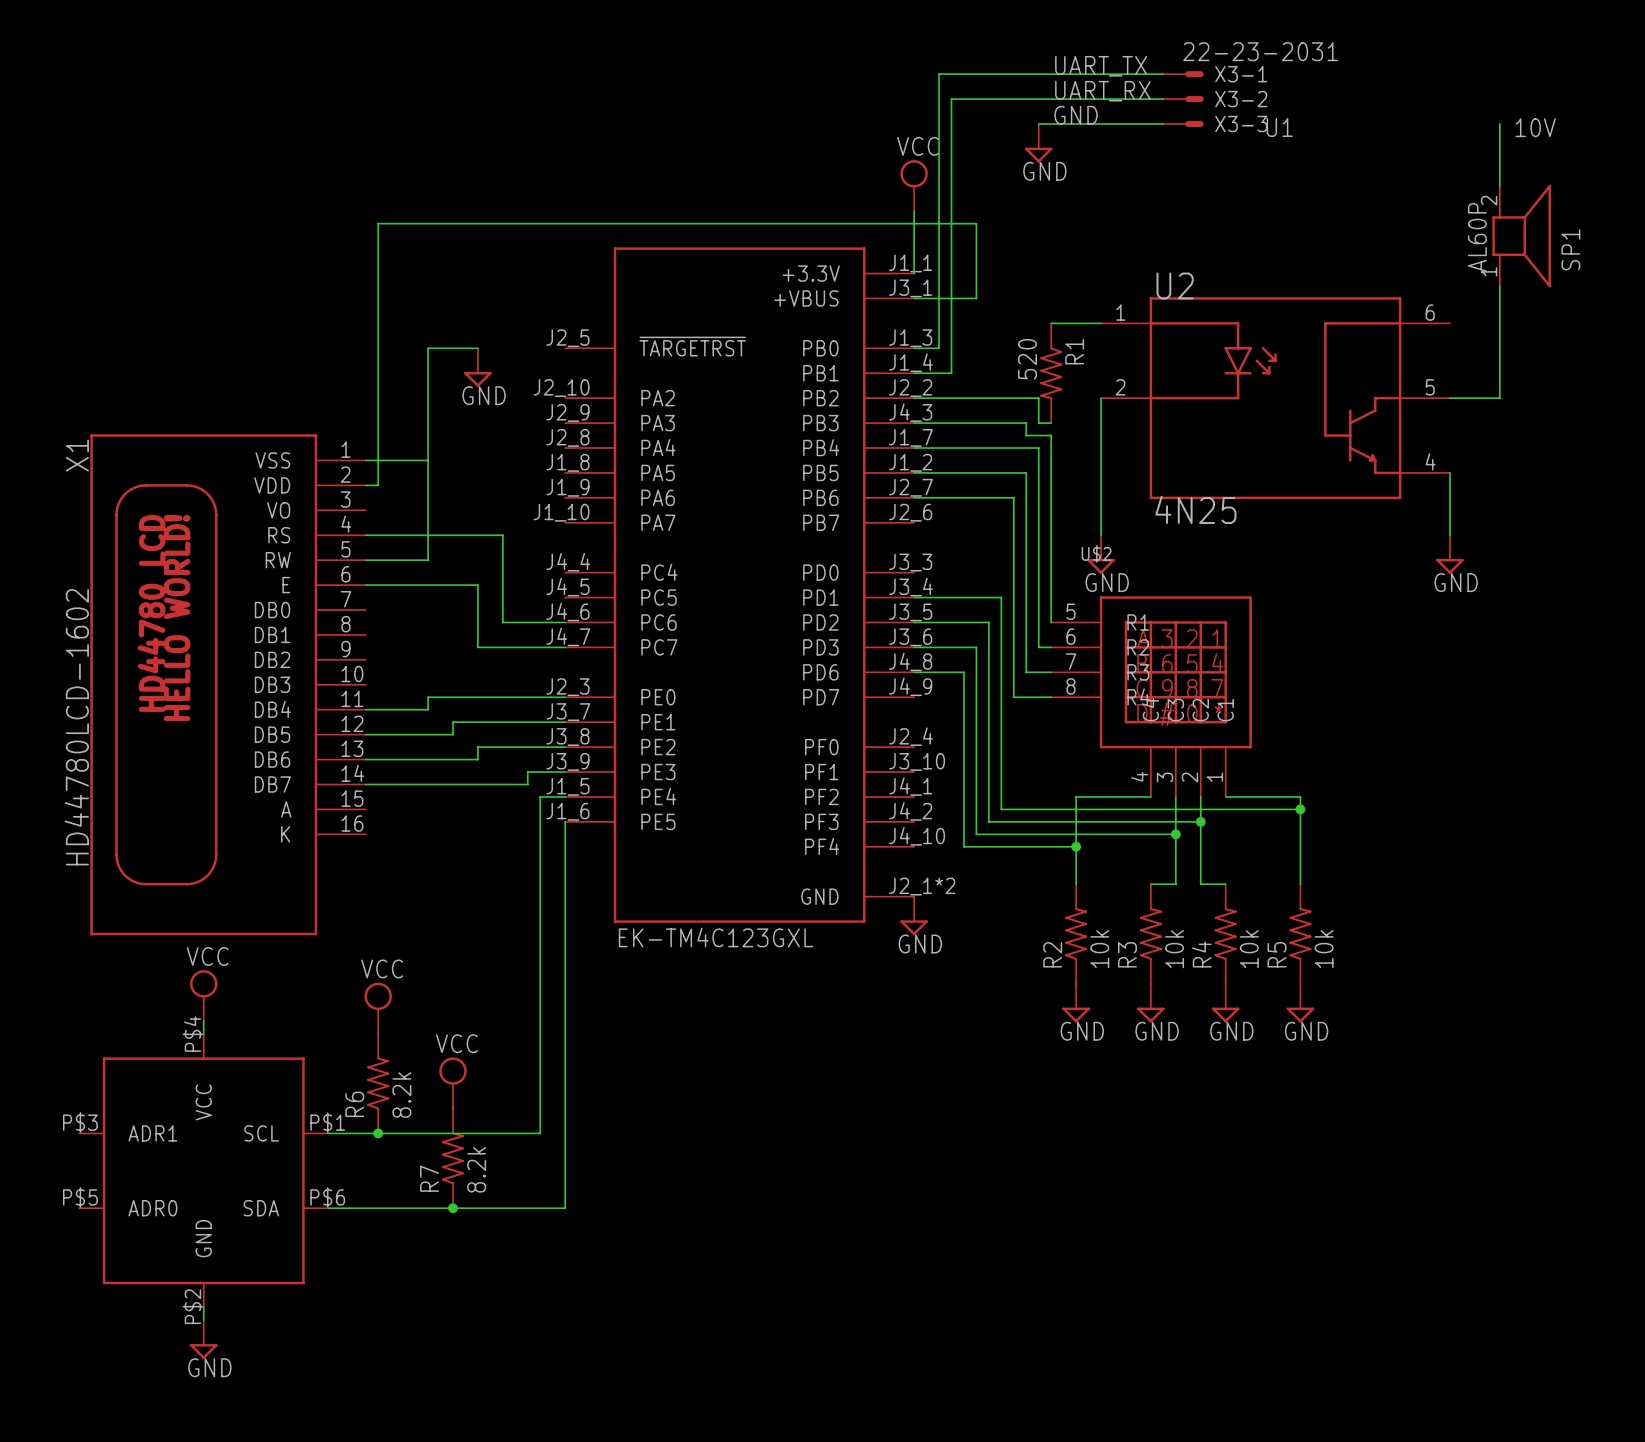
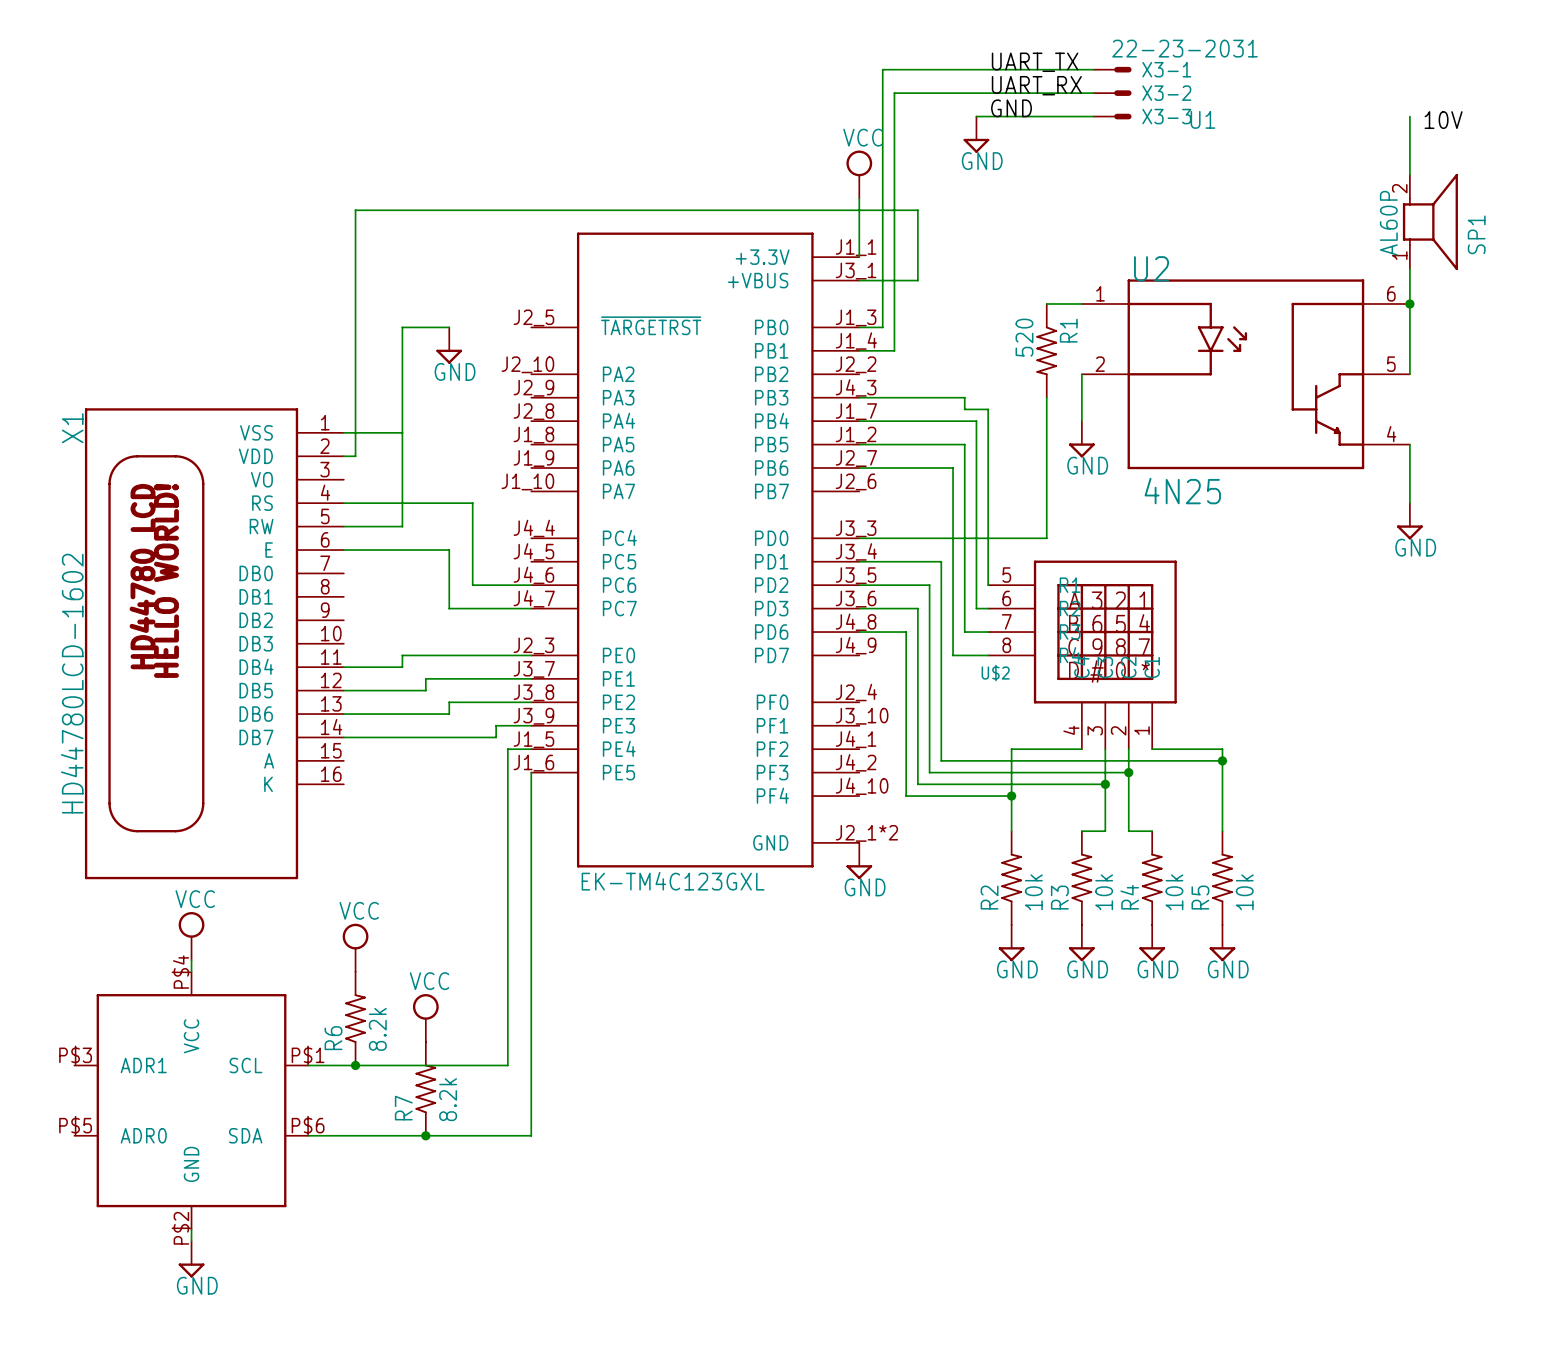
wire: (1051, 323) (1101, 323) -> none
junction: none -> (1409, 303)
R1 position: (1051, 373) -> (1046, 350)
wire: (914, 398) (1038, 398) (1038, 423) (1051, 423) -> none
wire: (1101, 398) (1101, 535) -> none
U2 position: (1275, 398) -> (1245, 374)
wire: none -> (1046, 397) (1046, 538) (859, 538)
wire: (1450, 472) (1450, 535) -> (1409, 444) (1409, 503)
U2 value position: 4N25 (1195, 509) -> 4N25 (1182, 491)
U$2 name position: U$2 (1096, 553) -> U$2 (995, 673)
power symbol position: GND (1101, 554) -> GND (1081, 439)
power symbol position: GND (1450, 554) -> GND (1409, 521)

